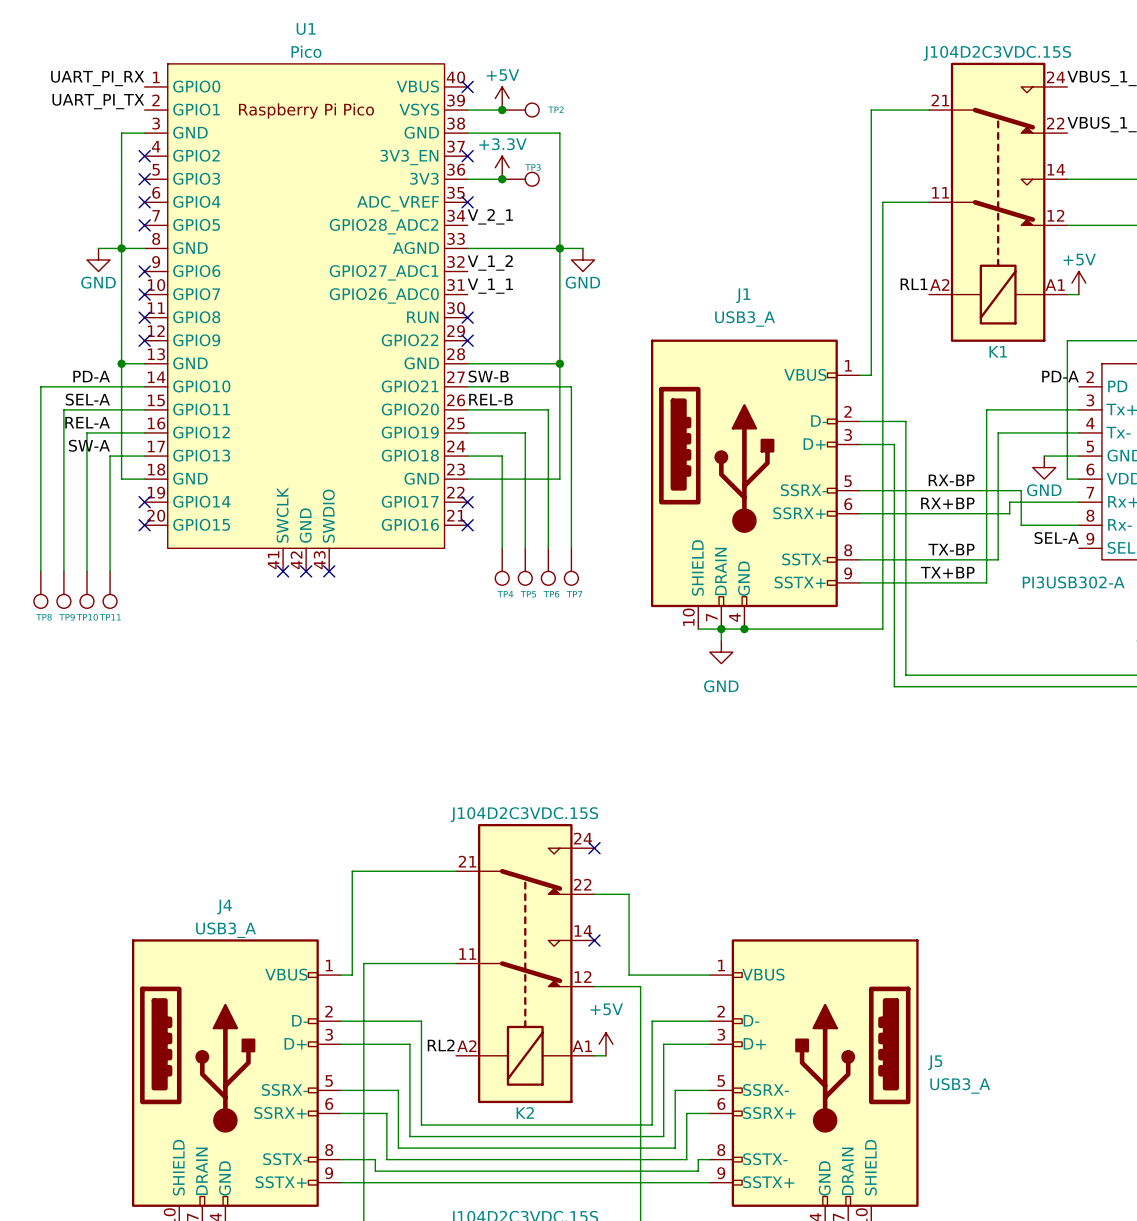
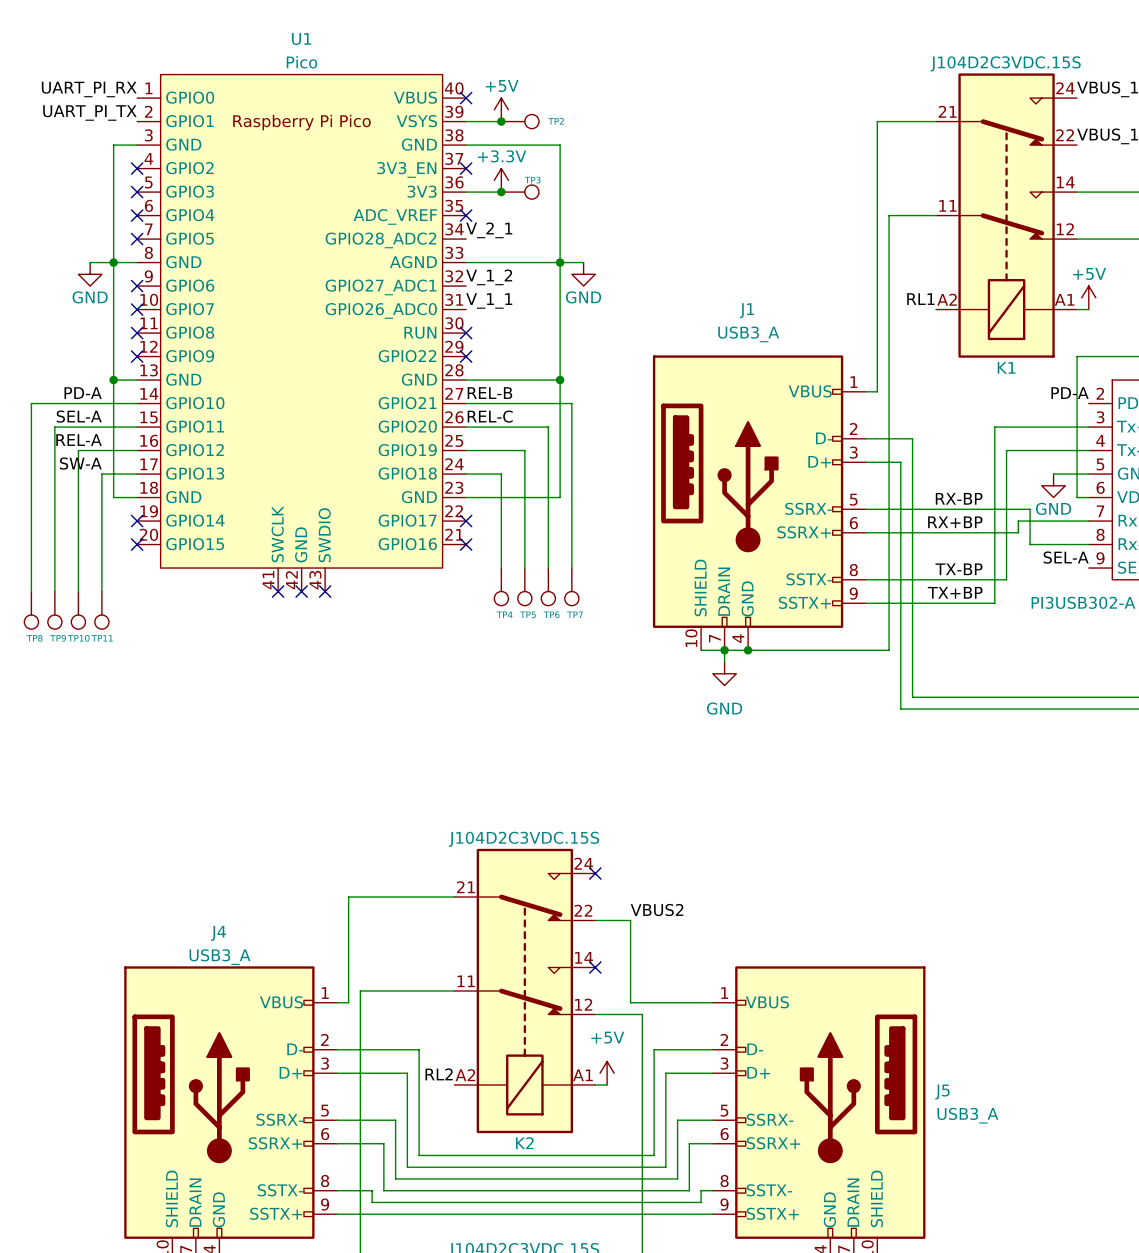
label: SW-B (488, 376) -> REL-B (489, 393)
label: REL-B (491, 399) -> REL-C (490, 416)
label: none -> VBUS2 (657, 910)

